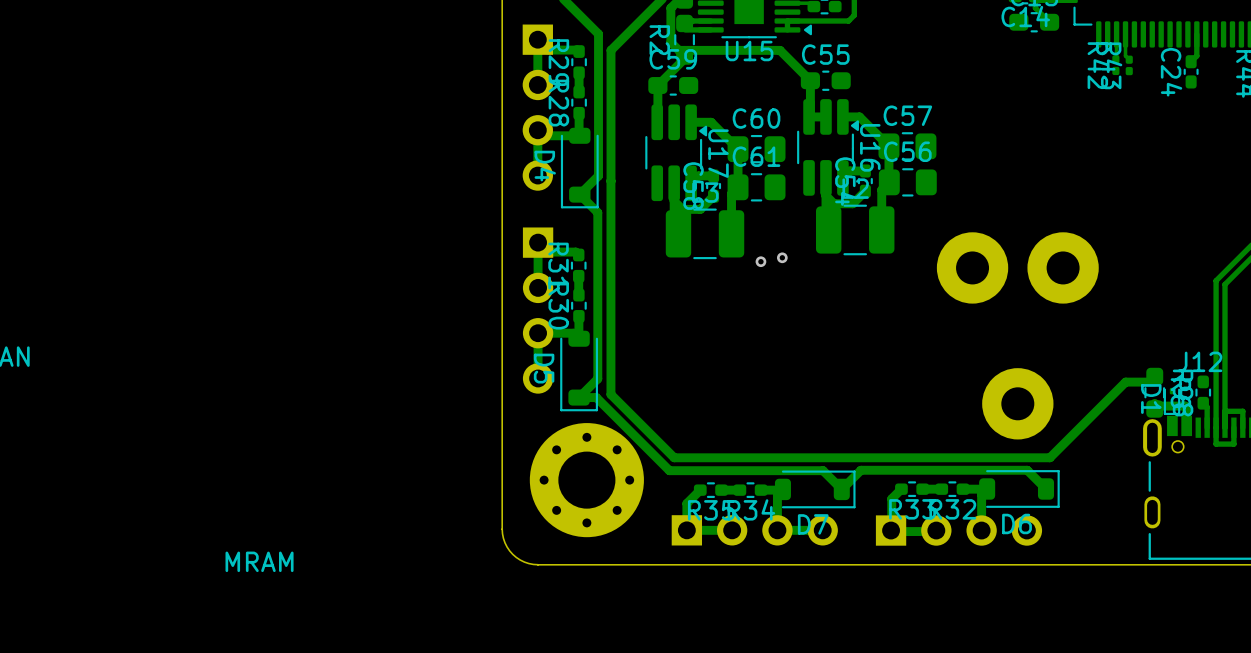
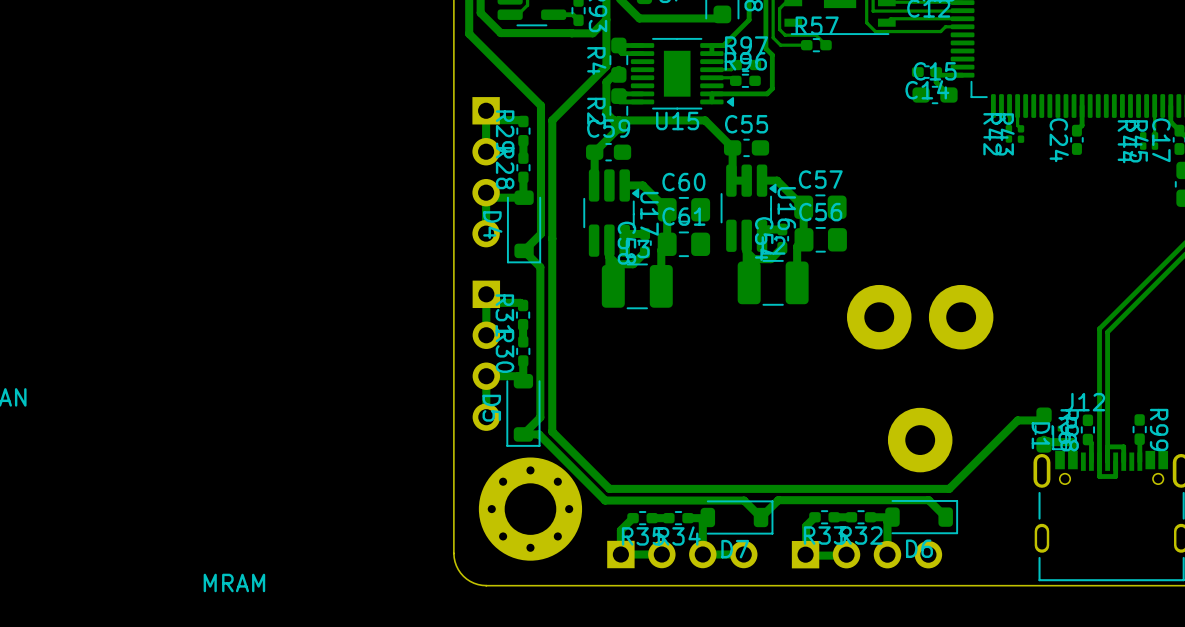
via: (782, 257) -> none
via: (760, 261) -> none

